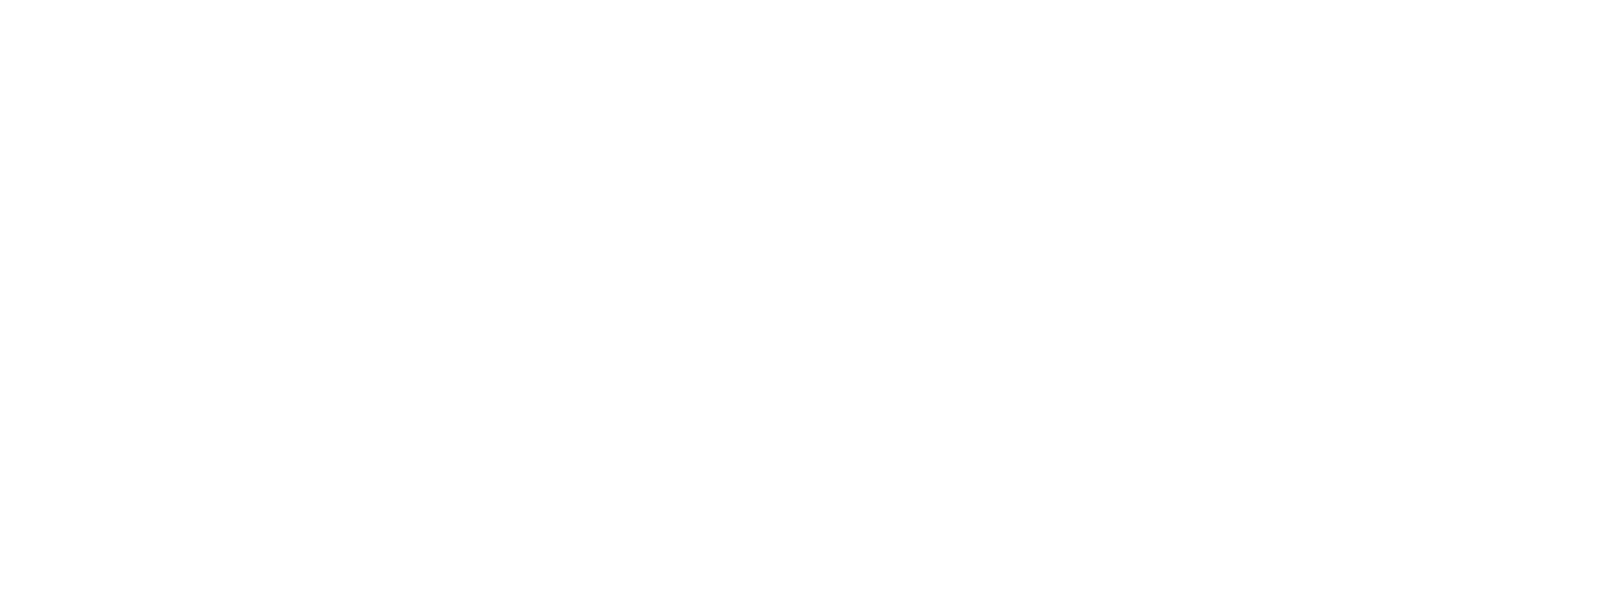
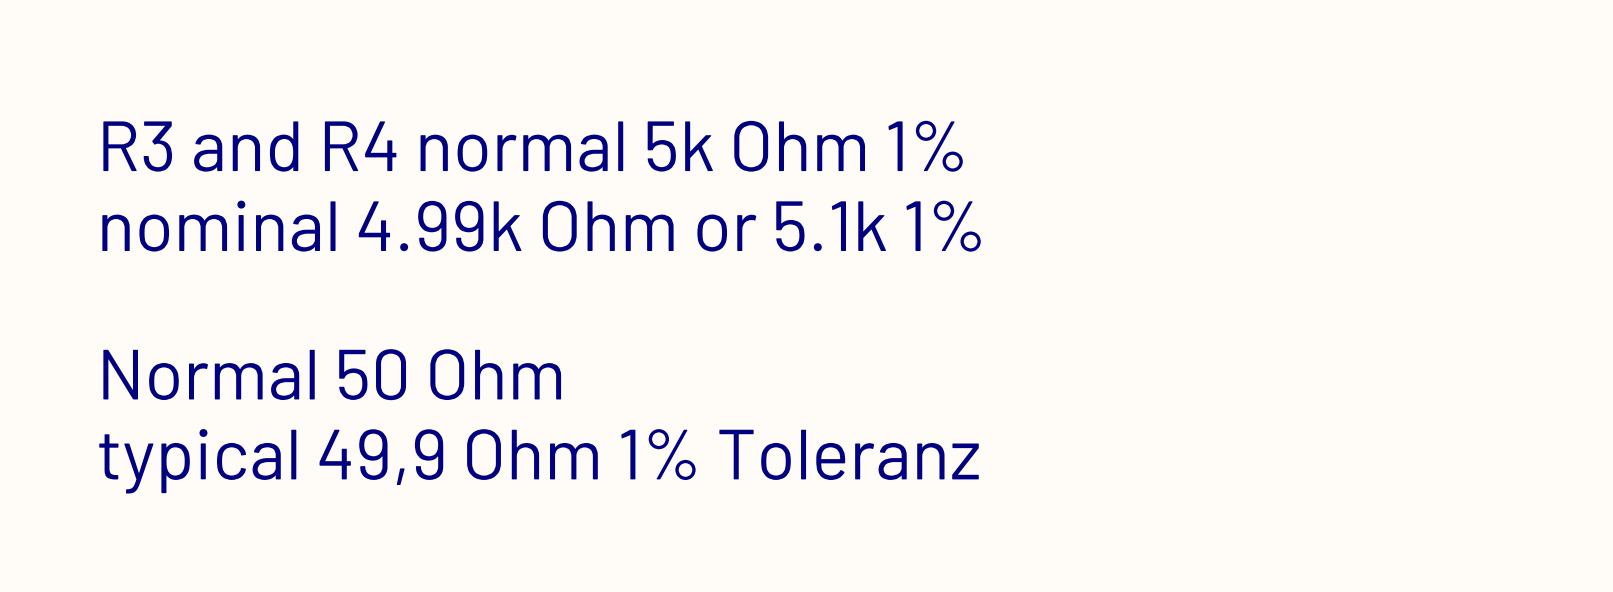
text: none -> R3 and R4 normal 5k Ohm 1% (533, 146)
text: none -> nominal 4.99k Ohm or 5.1k 1% (541, 226)
text: none -> Normal 50 Ohm (332, 374)
text: none -> typical 49,9 Ohm 1% Toleranz (539, 461)

